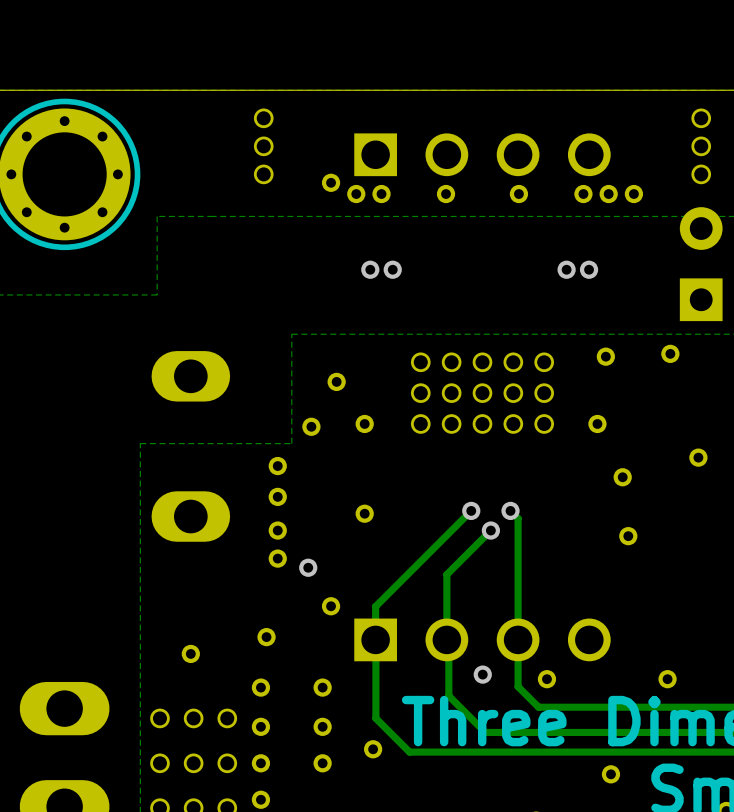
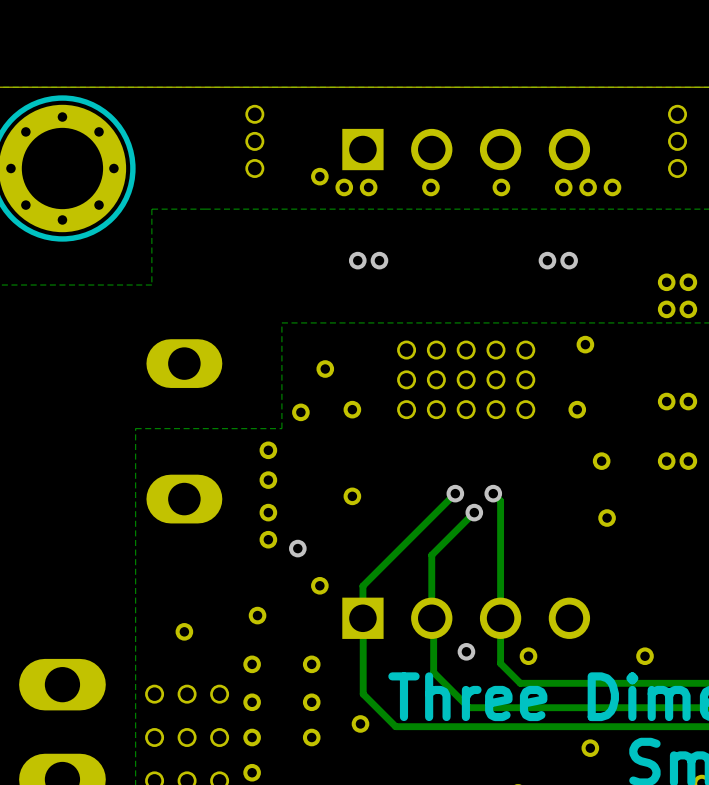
part: (701, 264) -> none
part: none -> (666, 282)
part: none -> (688, 282)
part: none -> (666, 309)
part: none -> (688, 309)
part: (670, 353) -> none
part: none -> (666, 401)
part: none -> (688, 401)
part: (698, 457) -> none
part: none -> (666, 461)
part: none -> (688, 461)

